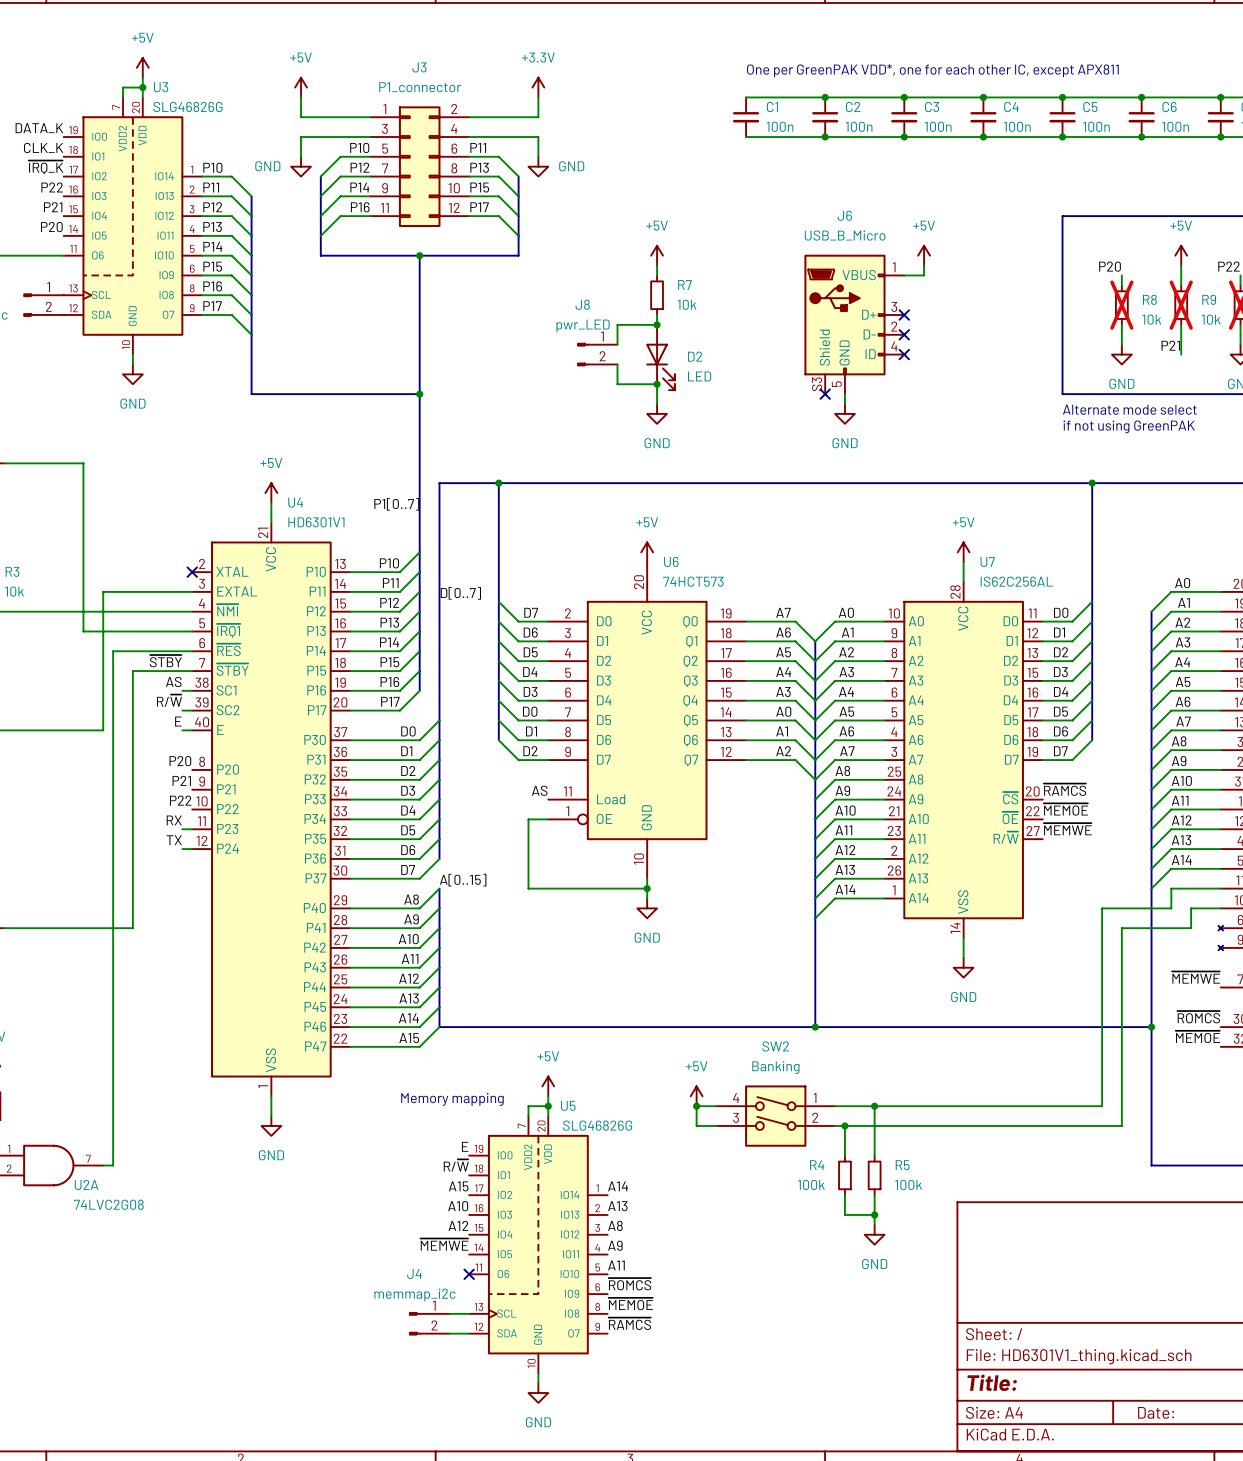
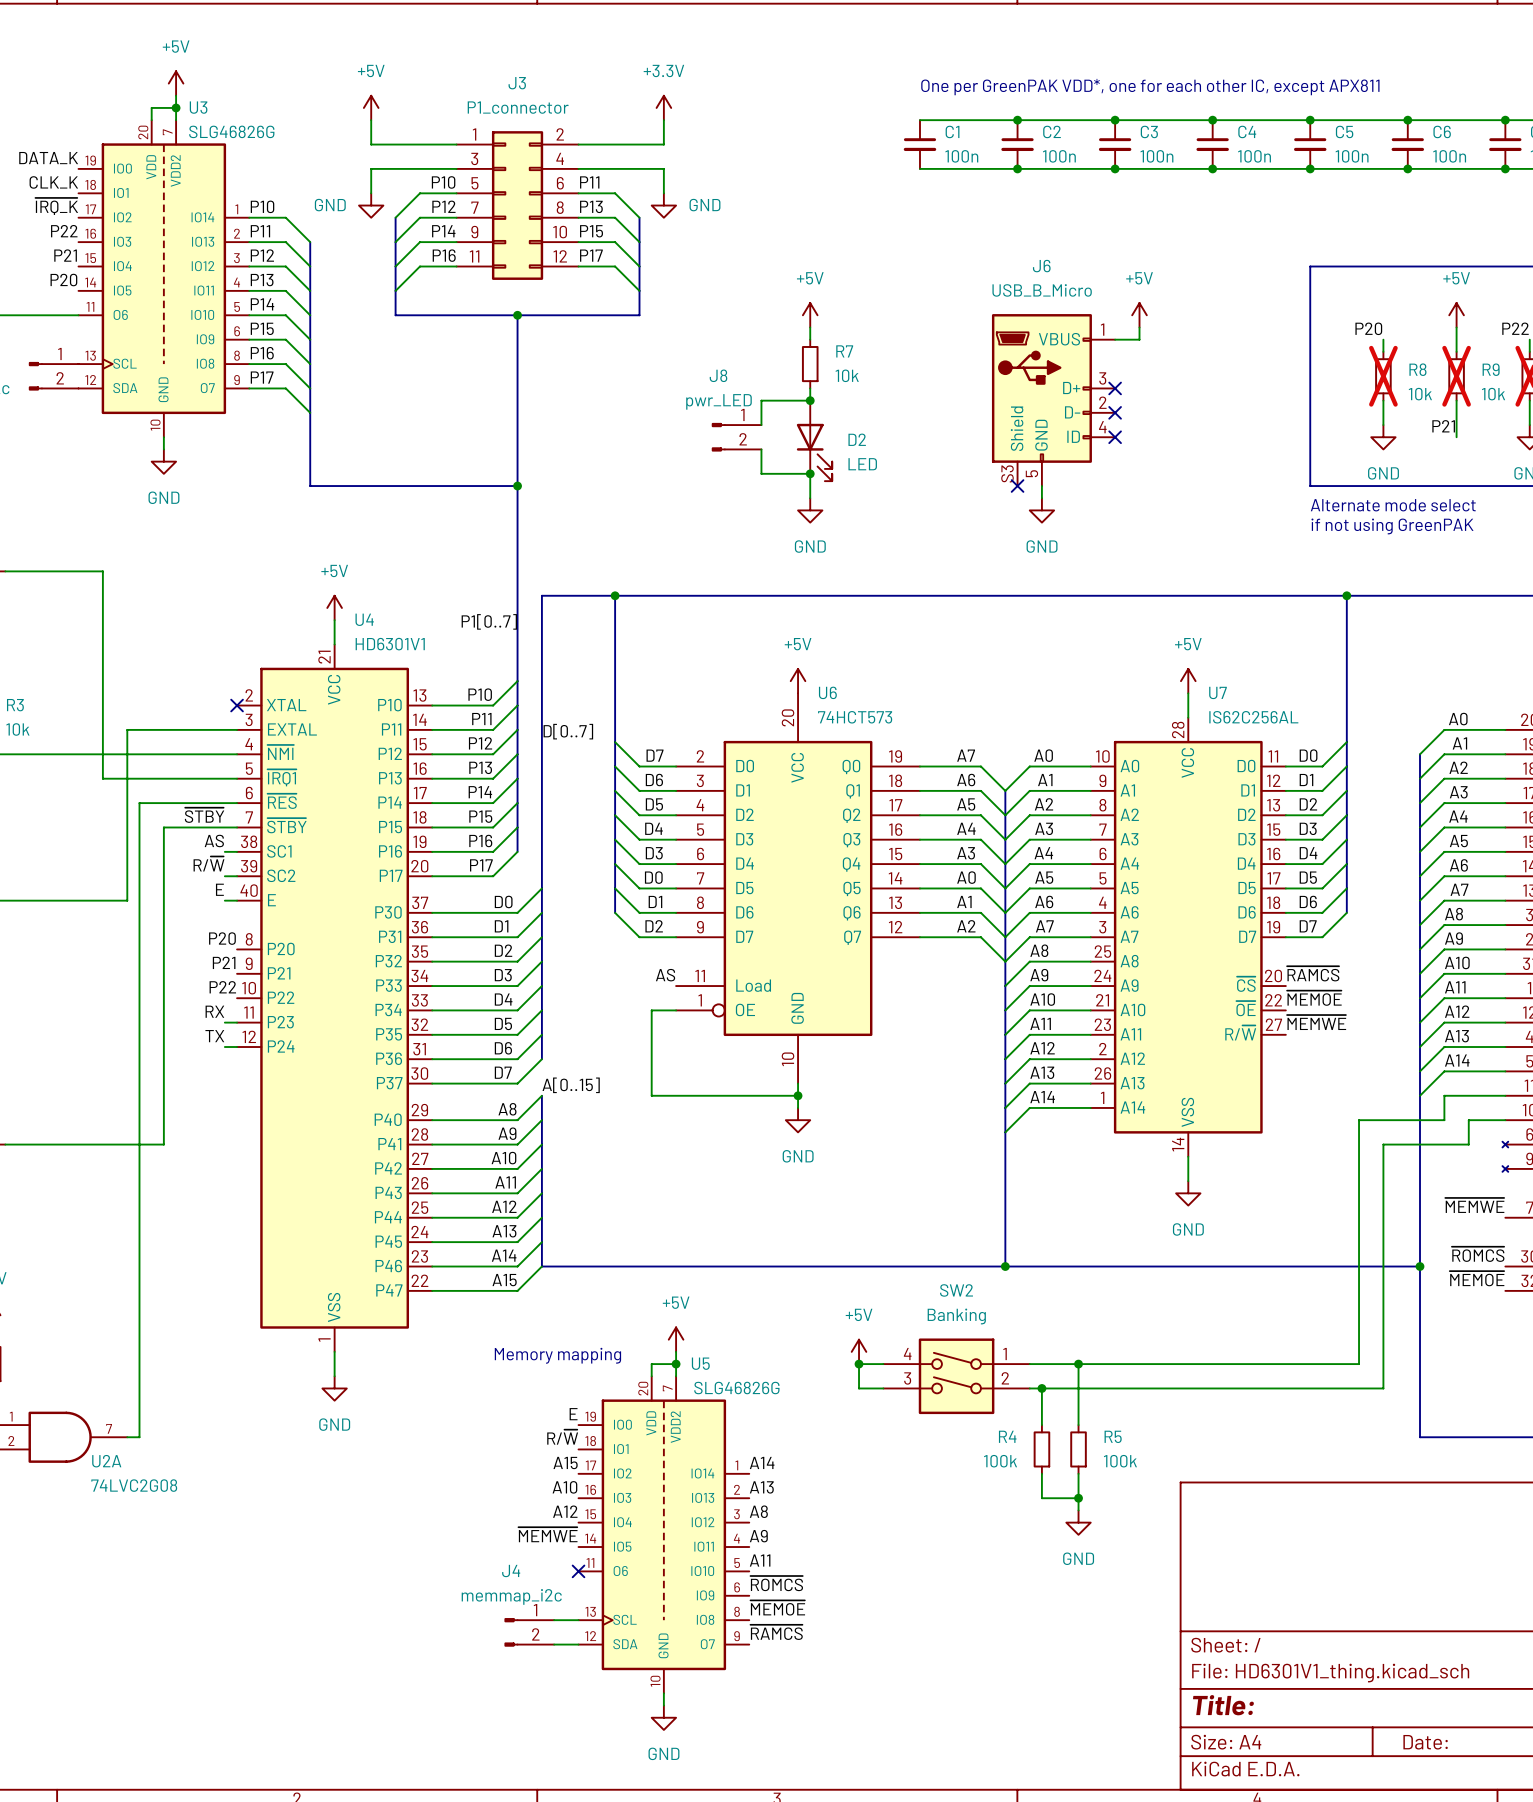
U3 symbol: [63, 97, 203, 355] -> [78, 120, 250, 438]
U5 symbol: [469, 1116, 608, 1374] -> [578, 1376, 750, 1694]

